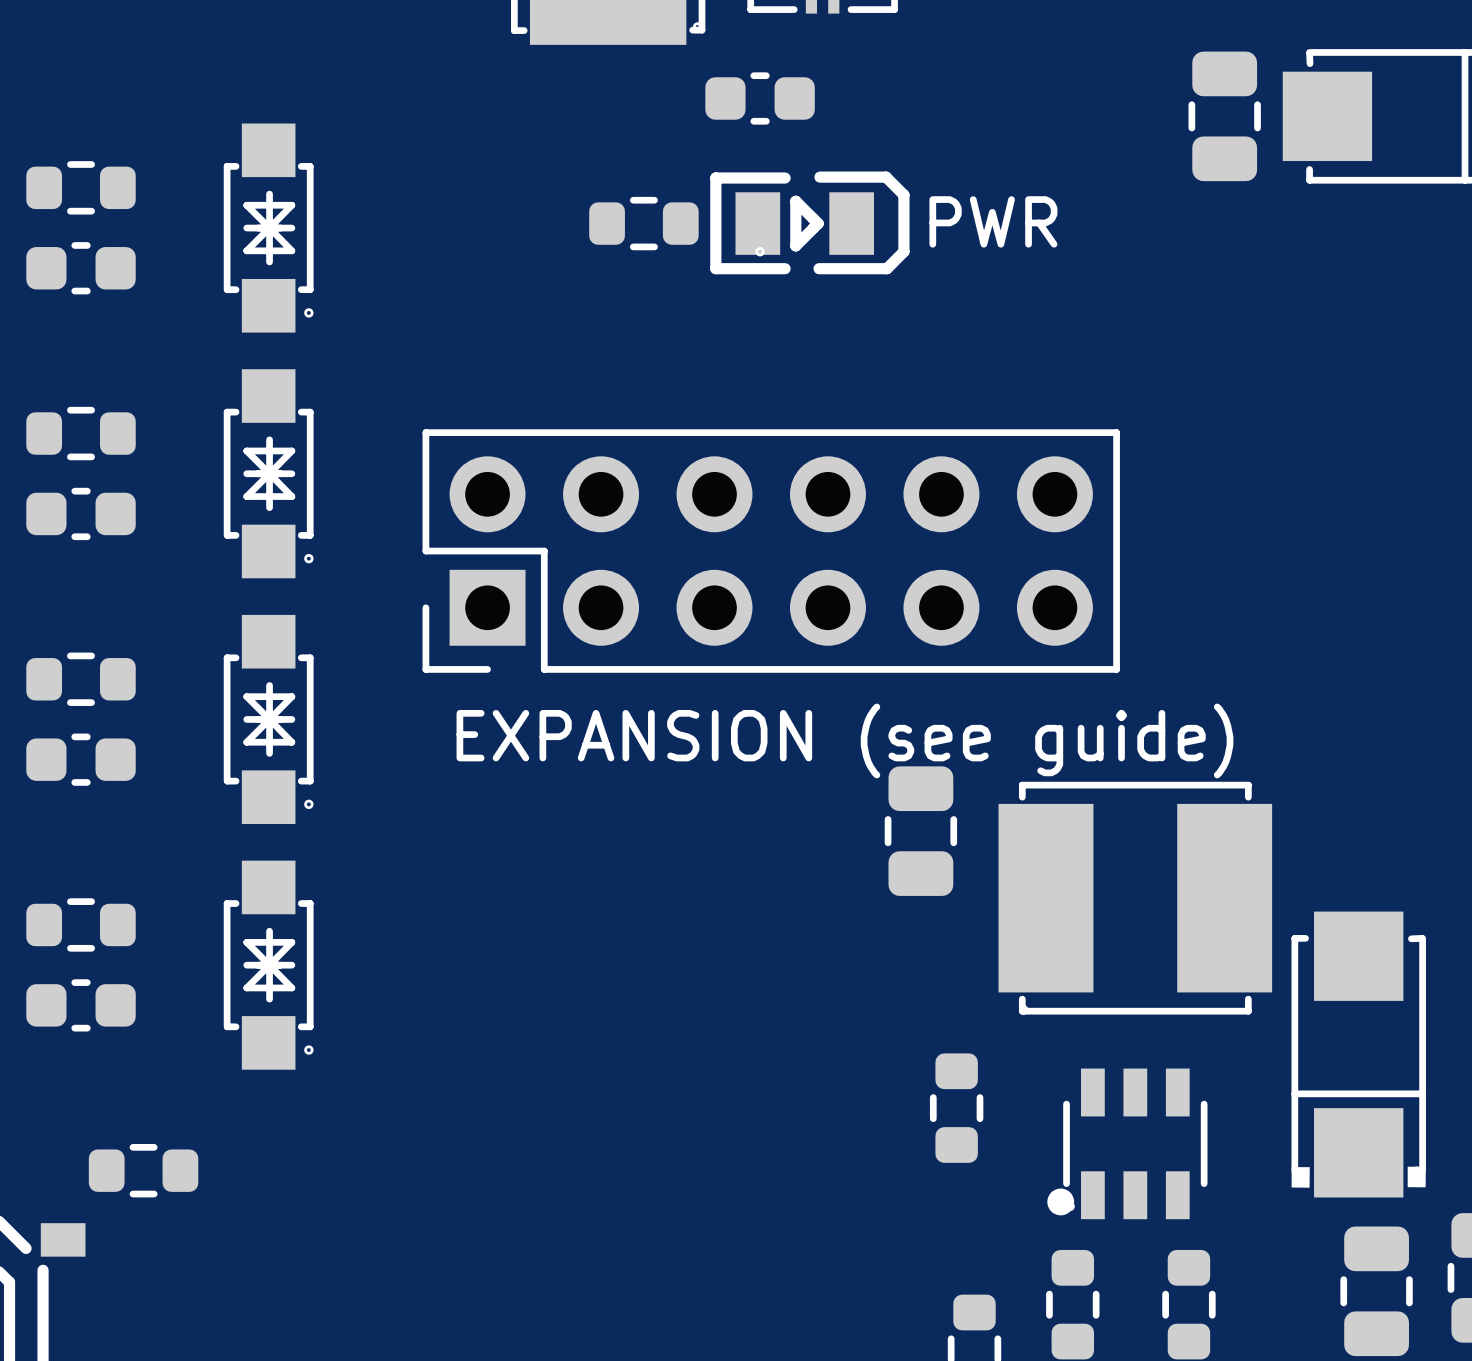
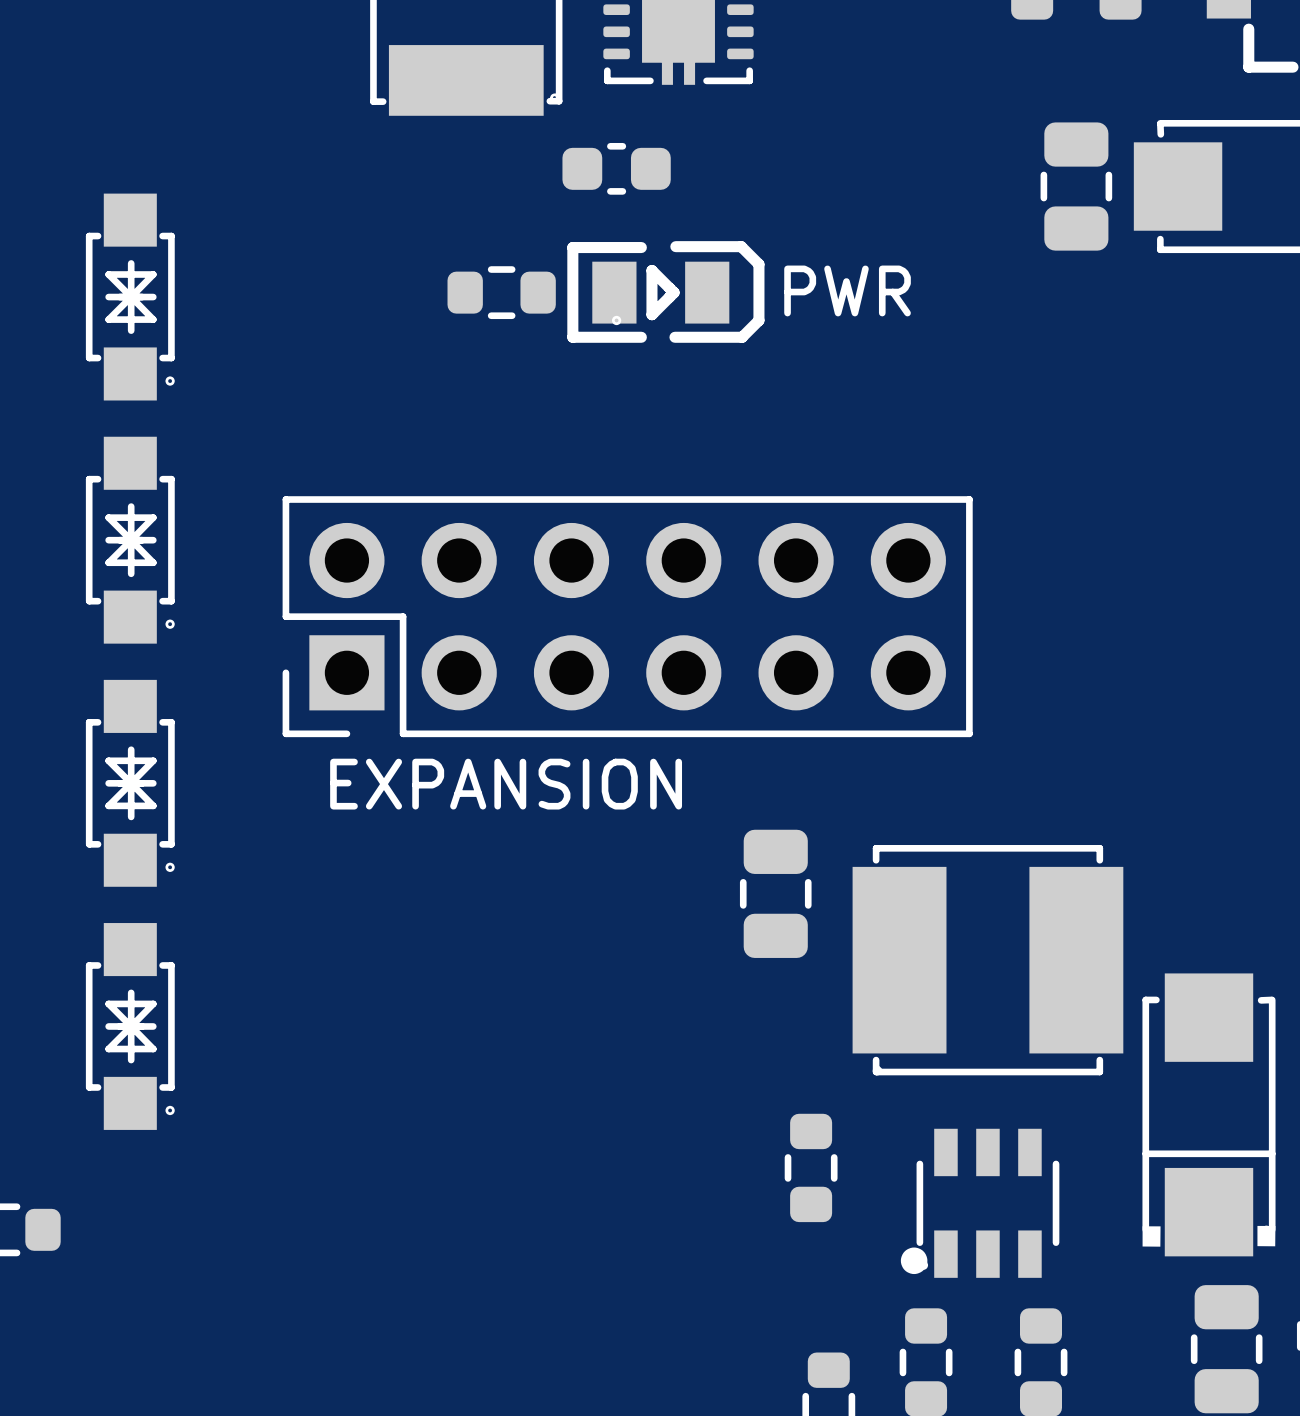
text: none -> EXPANSION (506, 784)
text: EXPANSION (see guide) (844, 740) -> none

